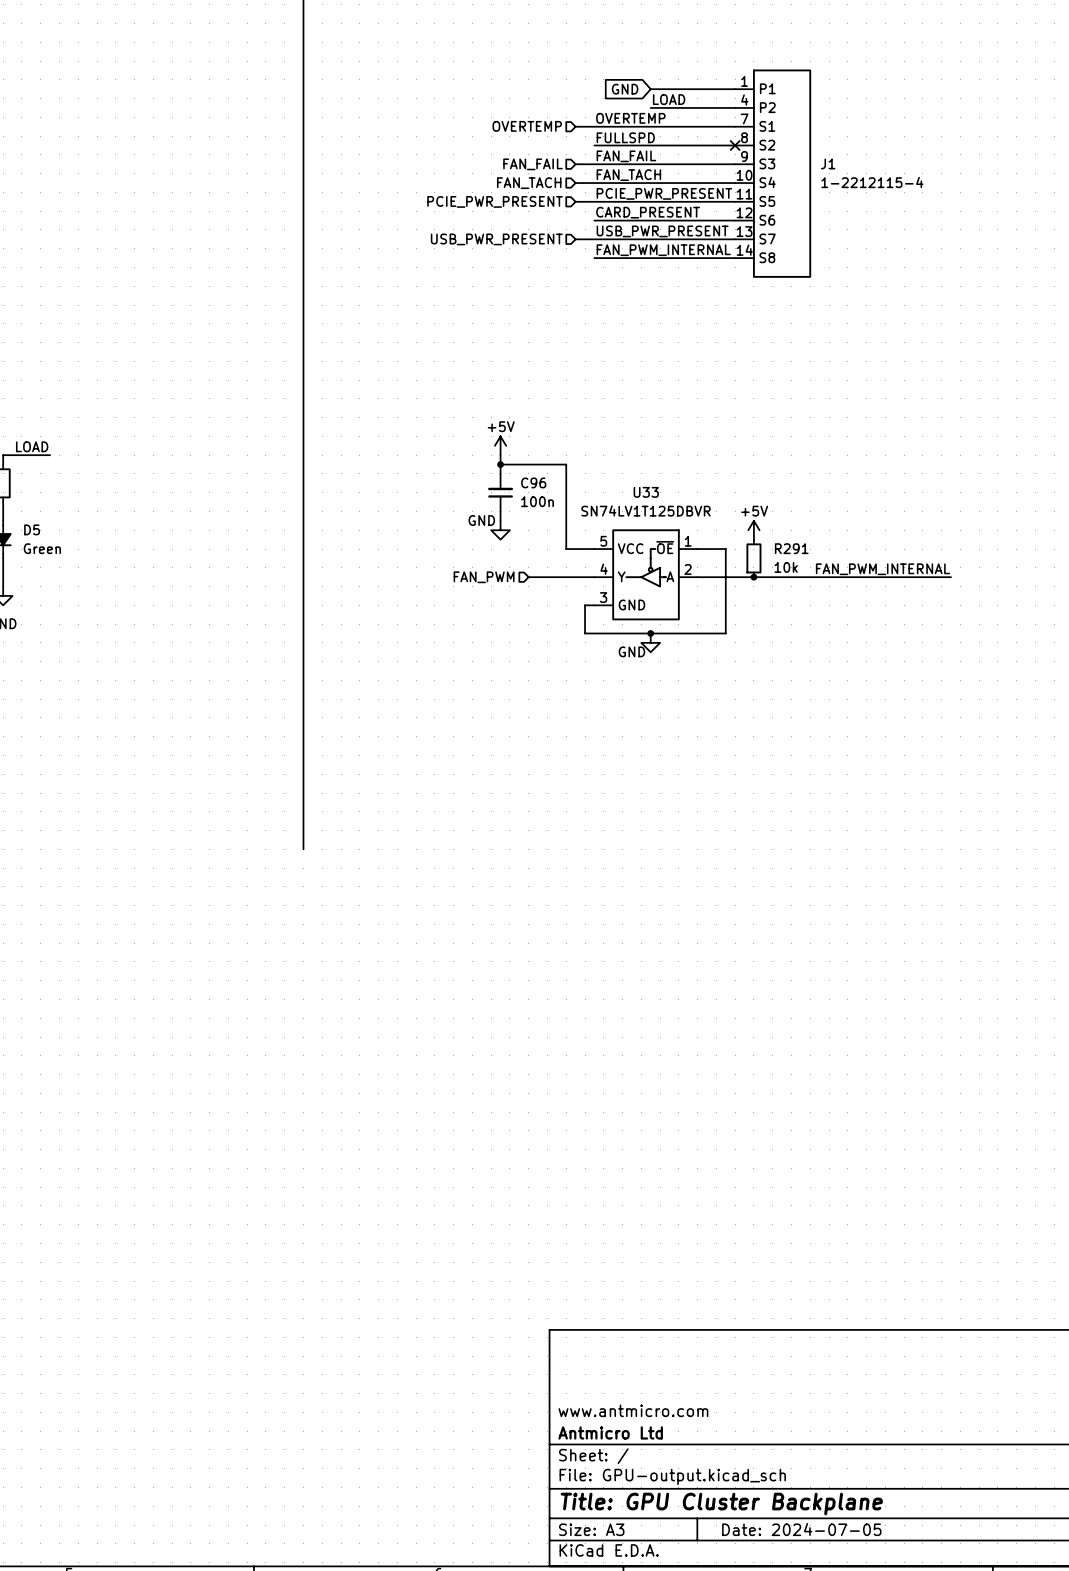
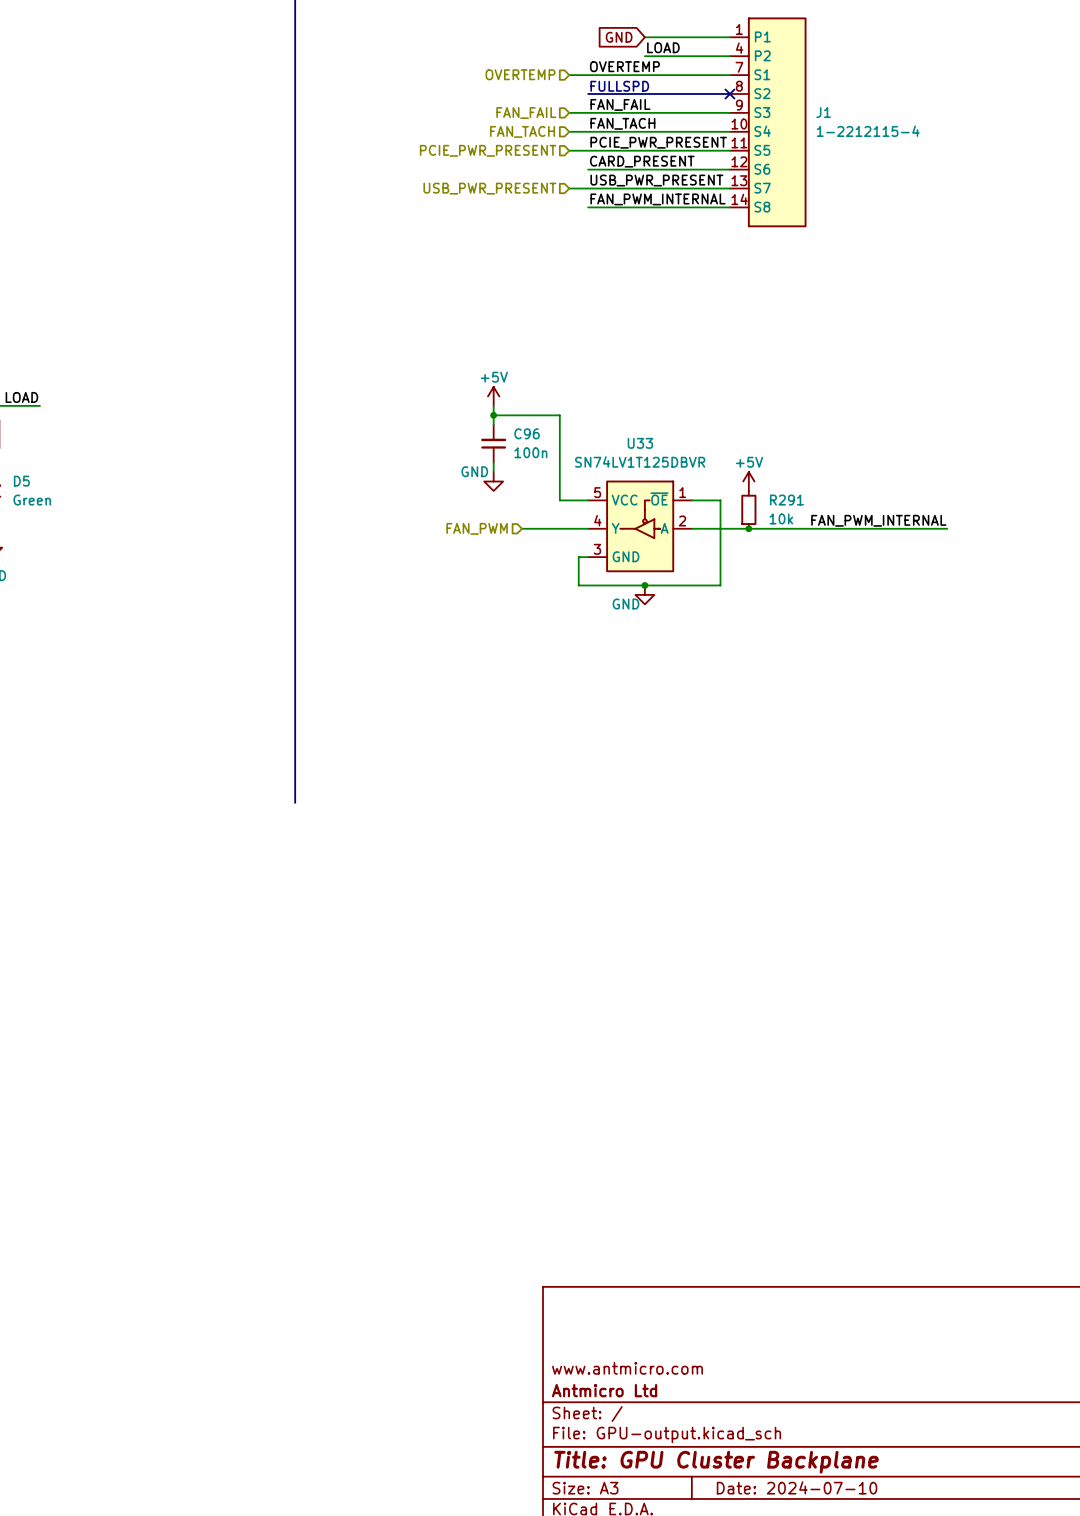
title block: Date: 2024-07-05 (801, 1529) -> Date: 2024-07-10 (797, 1487)

